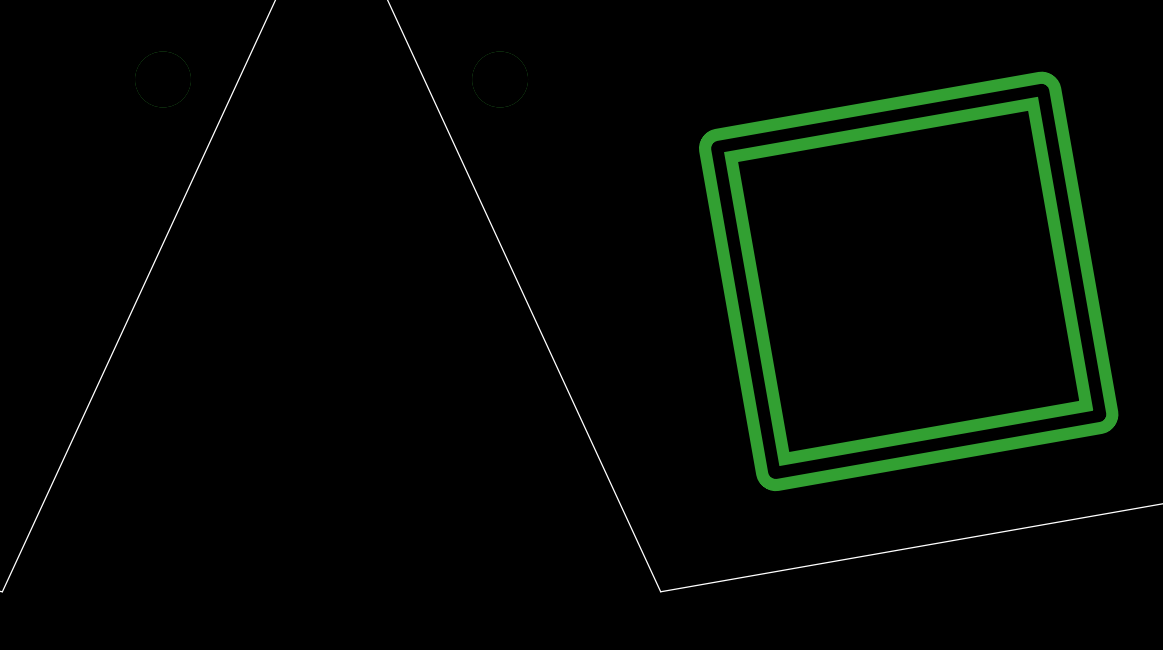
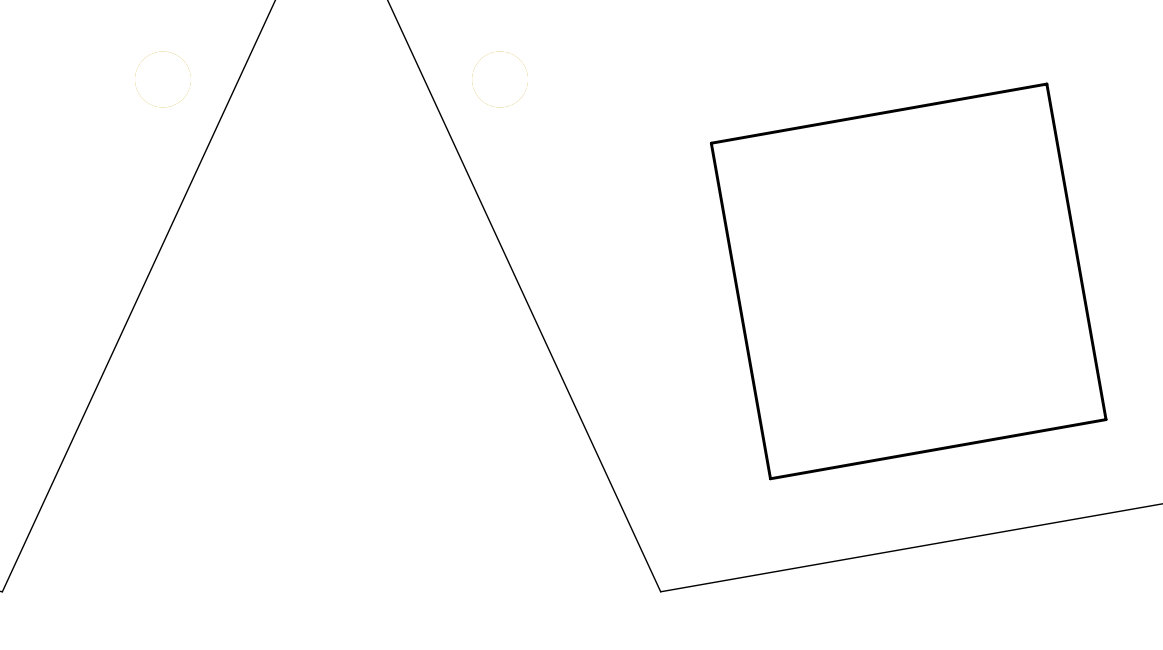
drawing: none -> [709, 82, 1108, 481]
part: (908, 281) -> none

